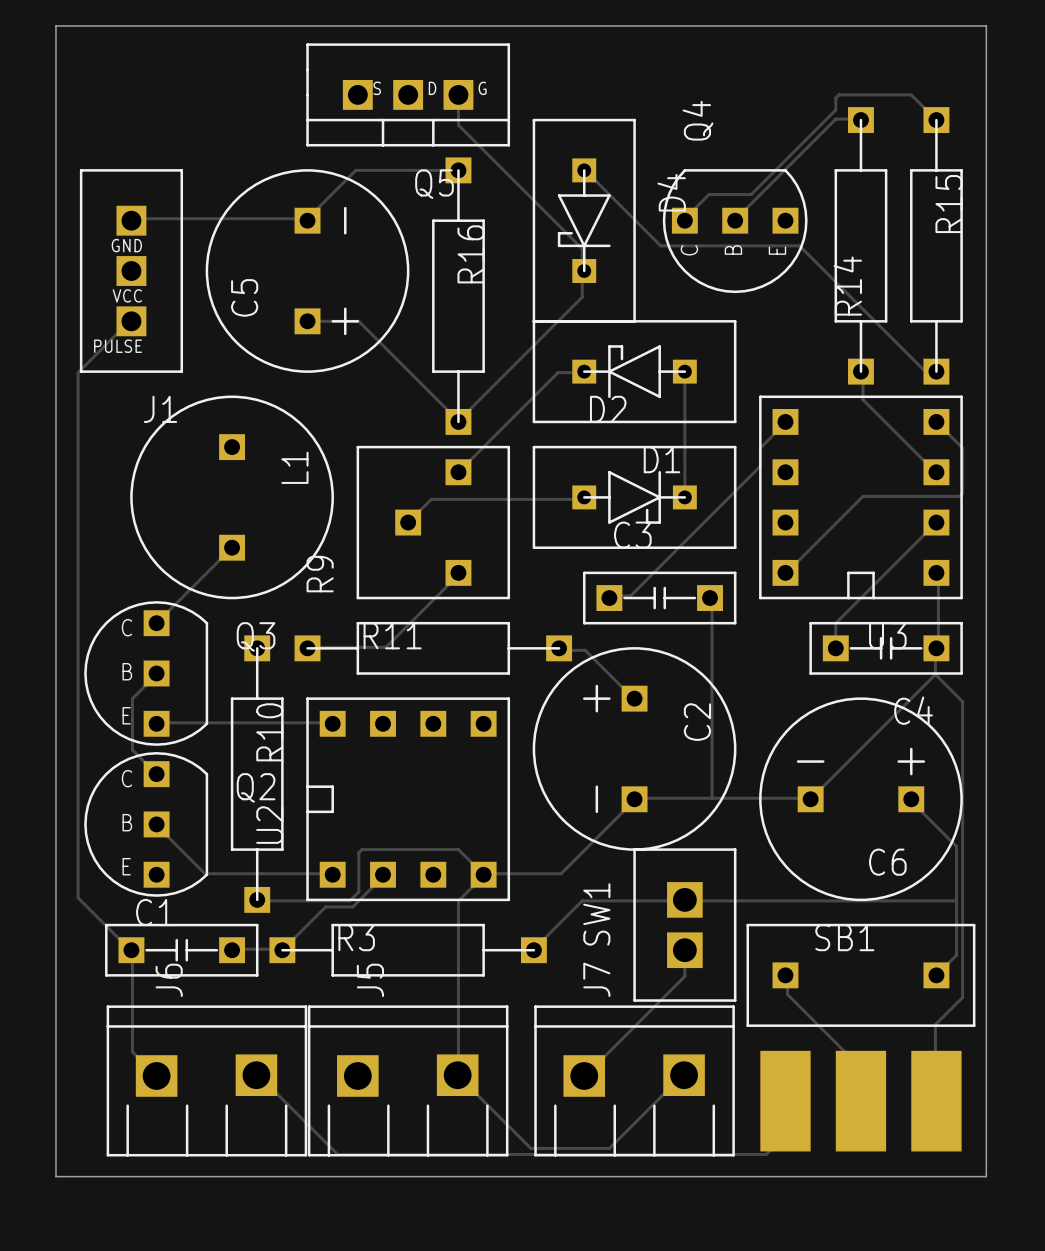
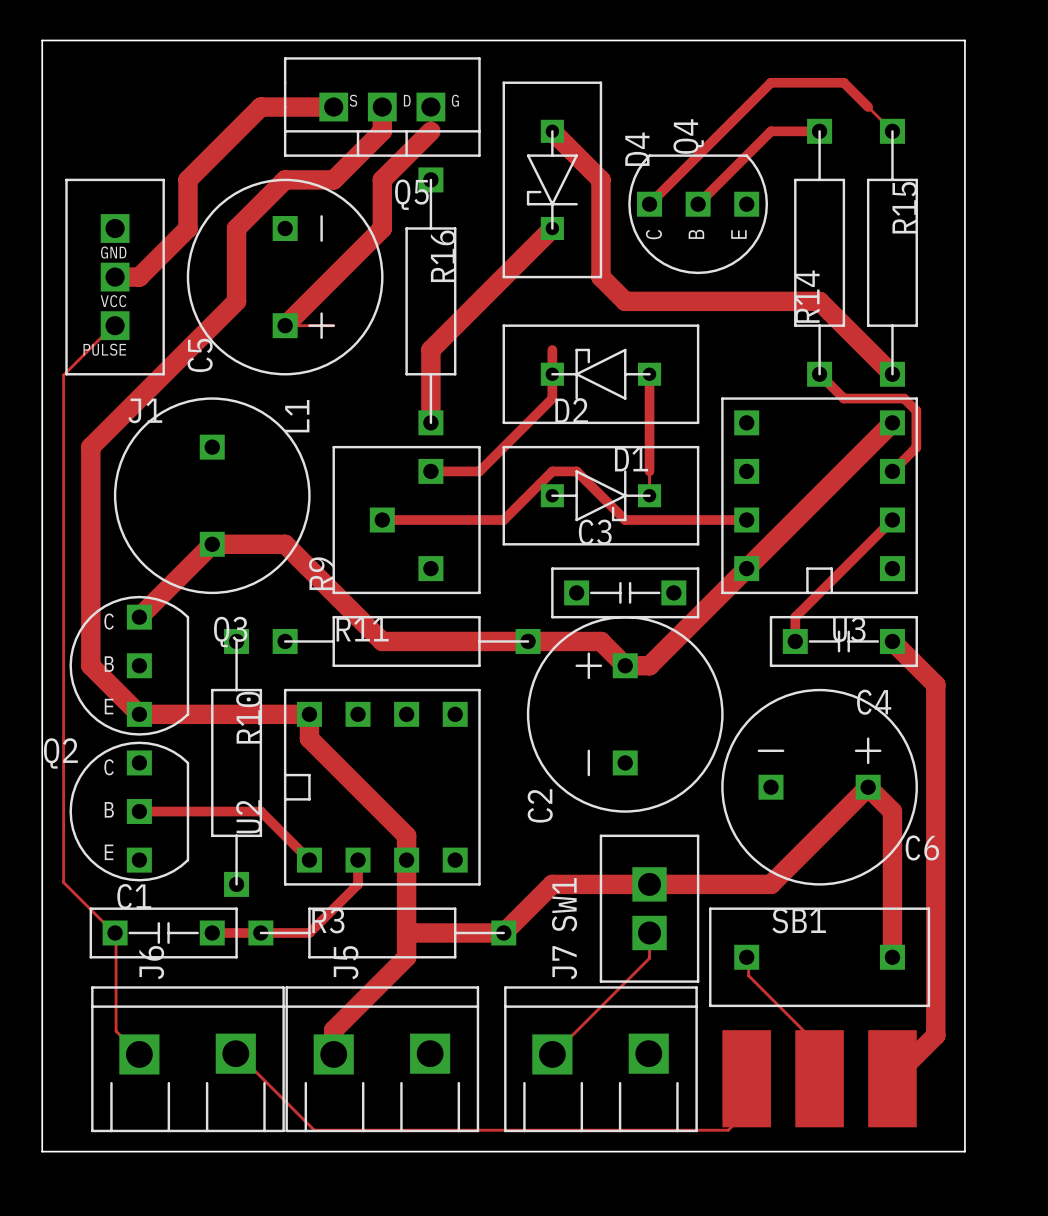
board edge: (986, 25) (986, 1176) -> (940, 40) (964, 40) (964, 1151) (940, 1151)
track: none -> (333, 107) (260, 107) (187, 179) (187, 228) (139, 277) (115, 277)
track: (911, 94) (838, 94) (835, 97) (835, 110) (751, 194) (709, 194) (684, 220) -> (868, 107) (843, 82) (771, 82) (649, 204)
track: (458, 120) (458, 125) (582, 248) (582, 270) (584, 271) (582, 273) (582, 297) (458, 420) (357, 321) -> (430, 131) (382, 179) (382, 228) (285, 325)
Q4 name position: Q4 (698, 120) -> Q4 (688, 136)
track: (860, 120) (835, 119) (735, 220) -> (819, 131) (771, 131) (698, 204)
track: (355, 170) (307, 218) -> (331, 179) (285, 179) (236, 228) (236, 301) (90, 447) (90, 665) (139, 714) (309, 714) (309, 738) (406, 835) (406, 957) (333, 1030) (333, 1054)
track: (357, 170) (458, 170) -> (333, 179) (382, 131) (382, 107)
track: (584, 170) (660, 245) (799, 245) (923, 369) (935, 369) (936, 371) -> (552, 131) (600, 179) (600, 277) (625, 301) (819, 301) (892, 374)
track: (307, 218) (132, 218) (131, 220) -> none
track: none -> (552, 228) (430, 349) (430, 422)
D4 position: (584, 220) -> (552, 179)
Q4 position: (735, 231) -> (698, 214)
C5 name position: C5 (244, 297) -> C5 (200, 355)
track: (584, 371) (558, 372) (458, 472) -> (552, 349) (552, 398) (479, 471) (430, 471)
track width: thin (684, 371) (684, 472) -> thick (649, 374) (649, 471)
track: (860, 371) (862, 372) (862, 399) (936, 472) -> (819, 374) (843, 398) (904, 398) (916, 410) (916, 447) (892, 471)
track: (785, 421) (760, 448) (760, 466) (630, 596) (609, 596) (609, 598) -> none
track: (936, 421) (962, 448) (962, 493) (959, 496) (862, 496) (785, 572) -> (892, 422) (649, 665) (625, 665) (600, 641) (382, 641) (285, 544) (212, 544)
L1 name position: L1 (294, 467) -> L1 (297, 416)
track: (584, 497) (582, 499) (431, 499) (408, 522) -> (746, 520) (625, 520) (576, 471) (552, 471) (503, 520) (382, 520)
track width: thin (936, 522) (835, 623) (835, 648) -> thick (892, 520) (795, 617) (795, 641)
track width: thin (232, 547) (156, 623) -> thick (212, 544) (139, 617)
track: (458, 572) (386, 647) (307, 648) -> none
track: (936, 572) (938, 574) (938, 647) (935, 650) (935, 674) -> none
R9 name position: R9 (320, 574) -> R9 (321, 573)
track: (710, 598) (712, 599) (712, 798) -> none
track: (559, 648) (561, 650) (585, 650) (634, 698) -> none
track: (156, 673) (132, 698) (132, 749) (156, 774) -> none
track: (935, 674) (962, 701) (962, 997) (935, 1024) (936, 1101) -> (892, 641) (935, 684) (935, 1035) (892, 1078)
track: (935, 674) (810, 799) (636, 798) (561, 873) (483, 874) -> none
C2 name position: C2 (697, 722) -> C2 (540, 805)
C2 position: (634, 748) -> (625, 714)
Q2 name position: Q2 (256, 787) -> Q2 (60, 753)
track: (911, 799) (956, 846) (956, 955) (936, 975) -> (406, 932) (503, 932) (552, 884) (771, 884) (868, 787) (892, 811) (892, 957)
track: (156, 824) (204, 873) (331, 873) -> (139, 811) (260, 811) (308, 859)
C6 name position: C6 (887, 862) -> C6 (922, 847)
track: (483, 874) (458, 849) (361, 849) (358, 852) (358, 891) (349, 900) (257, 899) -> none
track: (483, 874) (458, 900) (457, 1075) (530, 1148) (609, 1148) (684, 1075) -> none
track: (383, 876) (352, 906) (325, 906) (282, 950) (232, 950) -> (358, 862) (358, 884) (309, 932) (212, 932)
track: (956, 900) (582, 900) (533, 950) -> none

